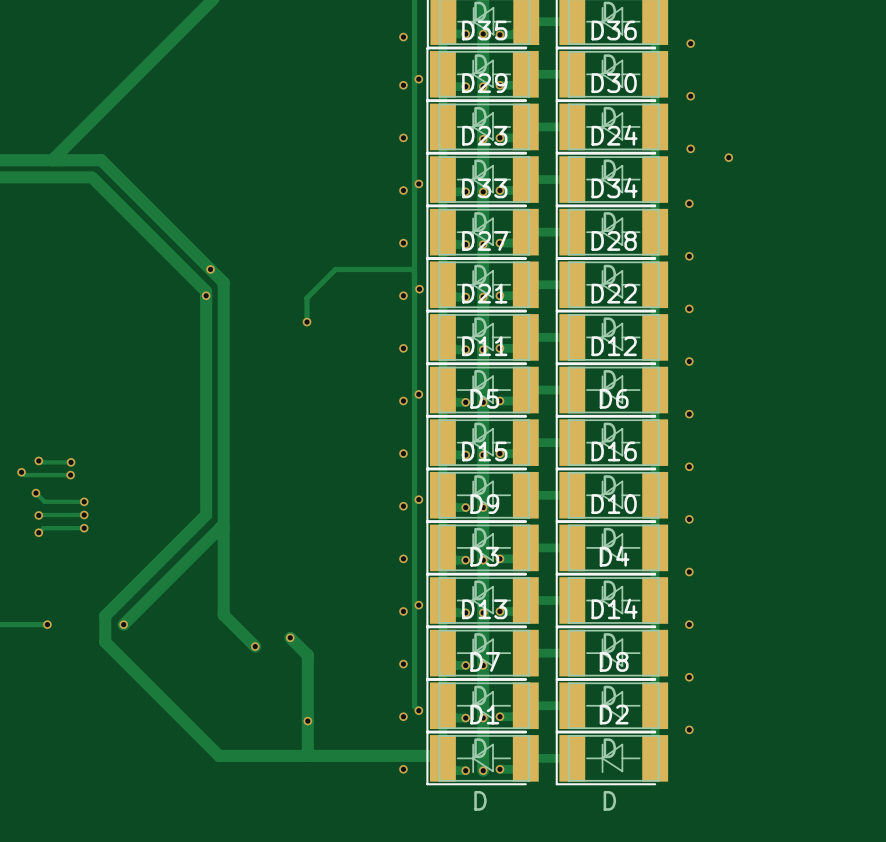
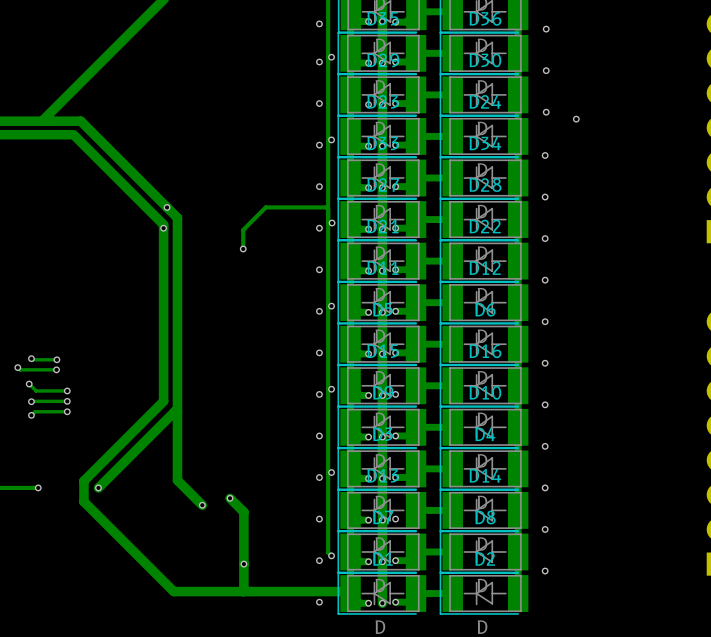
via: none -> (368, 104)
via: none -> (395, 394)
via: none -> (395, 519)

